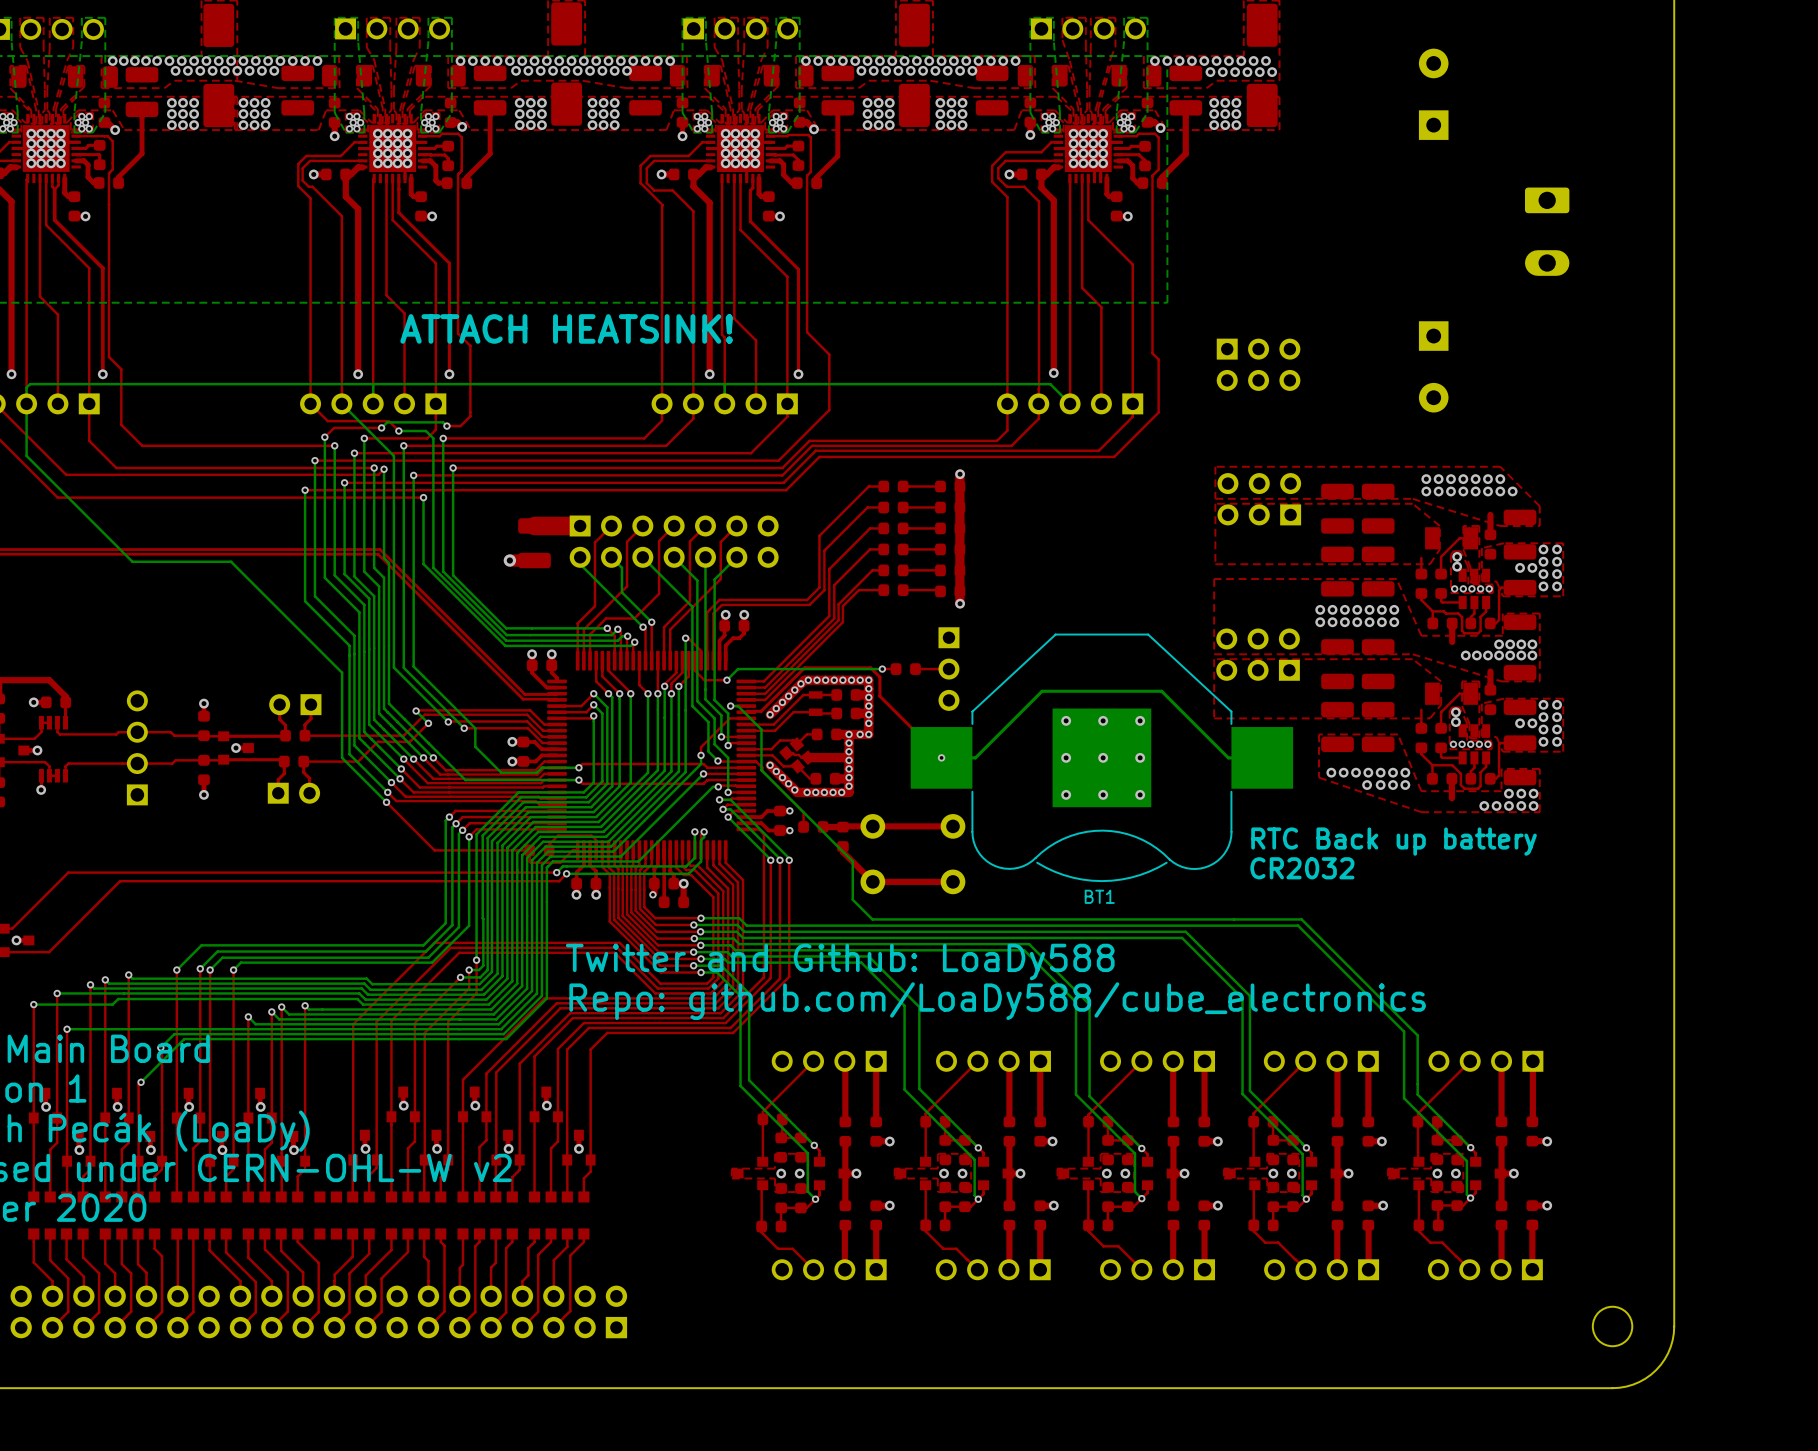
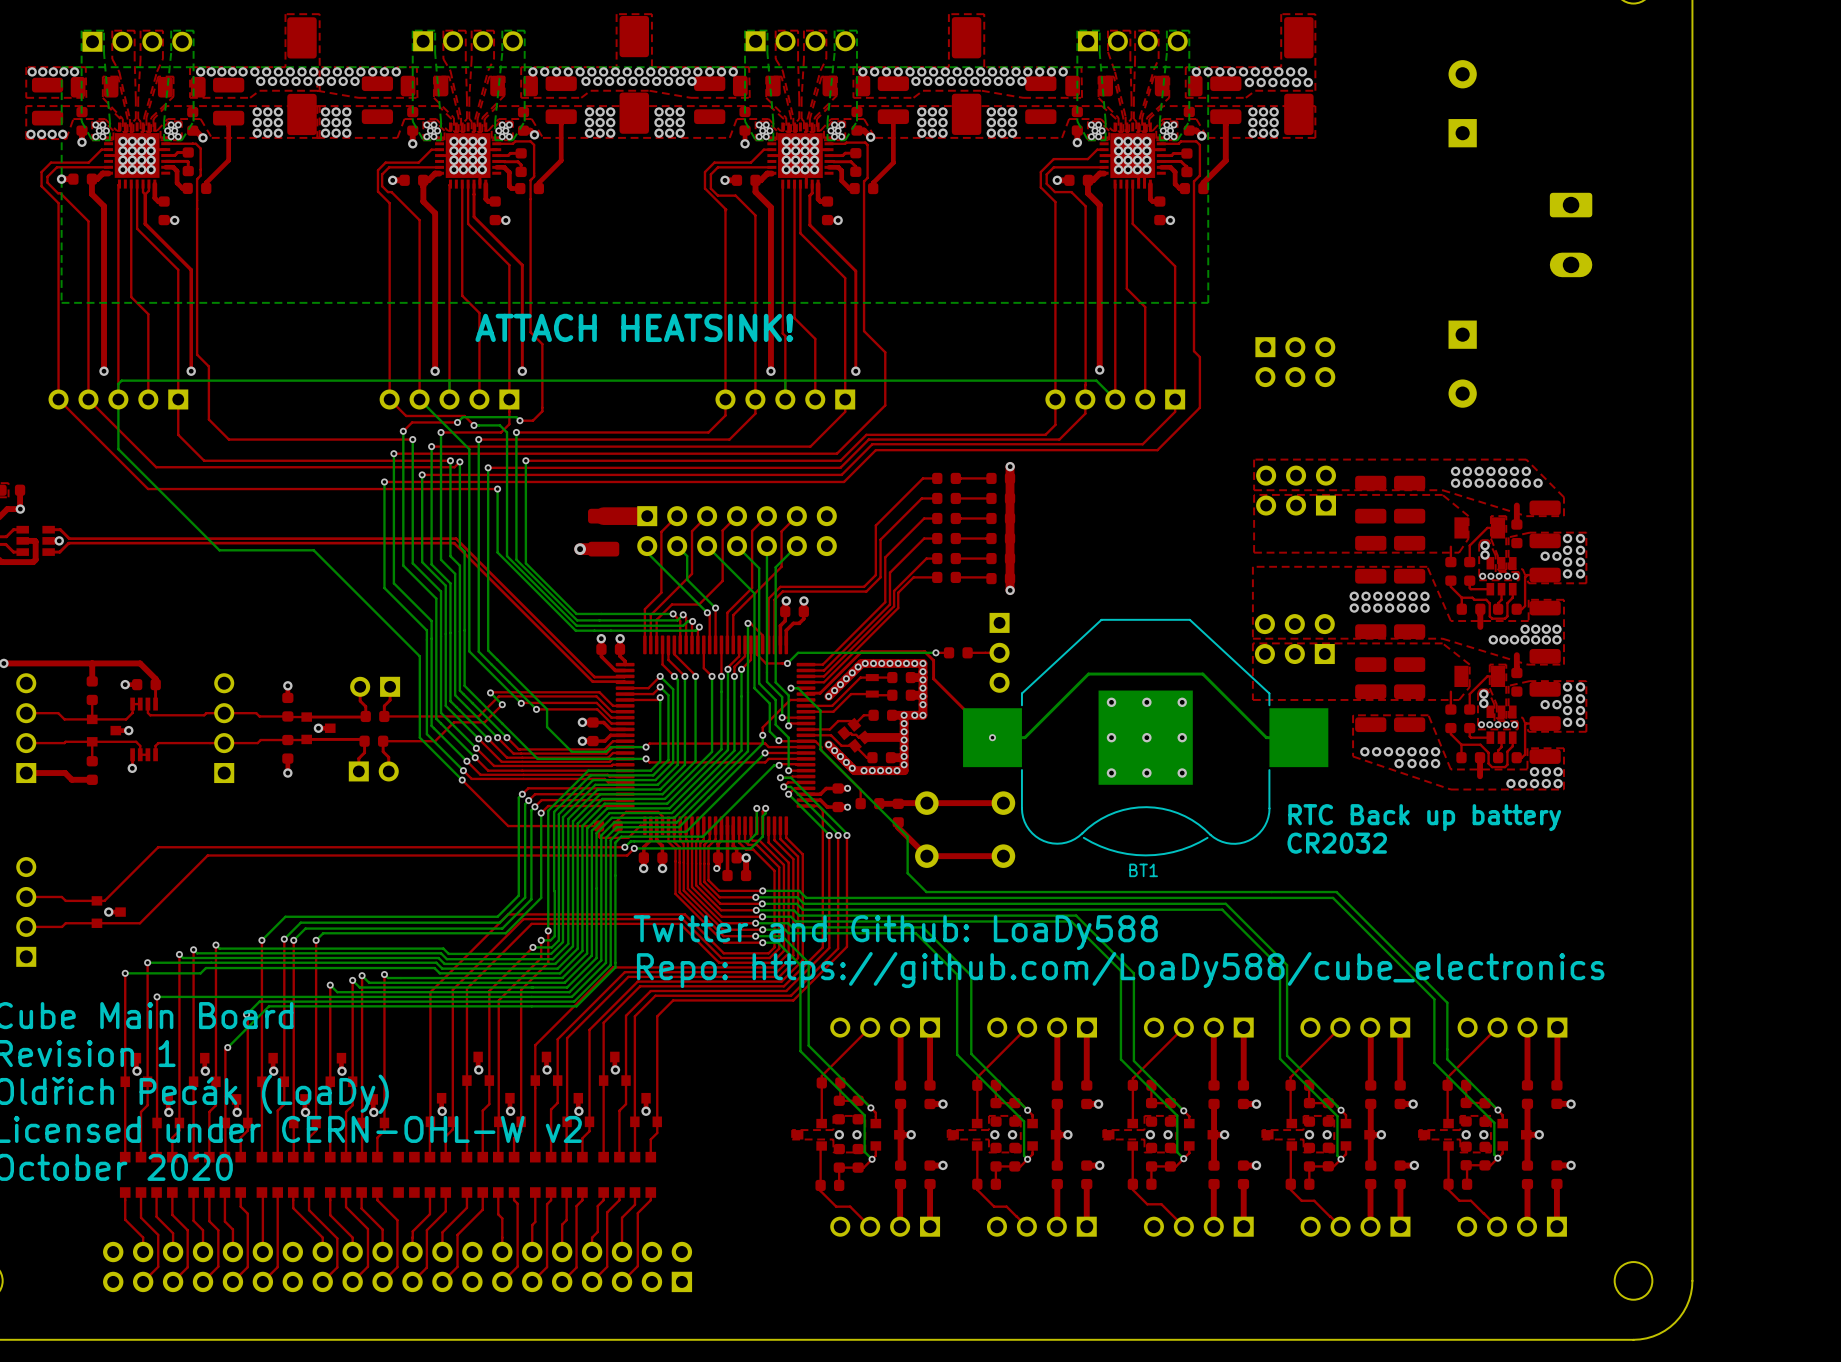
text: Repo: github.com/LoaDy588/cube_electronics (997, 1001) -> Repo: https://github.com/LoaDy588/cube_electronics (1120, 970)

